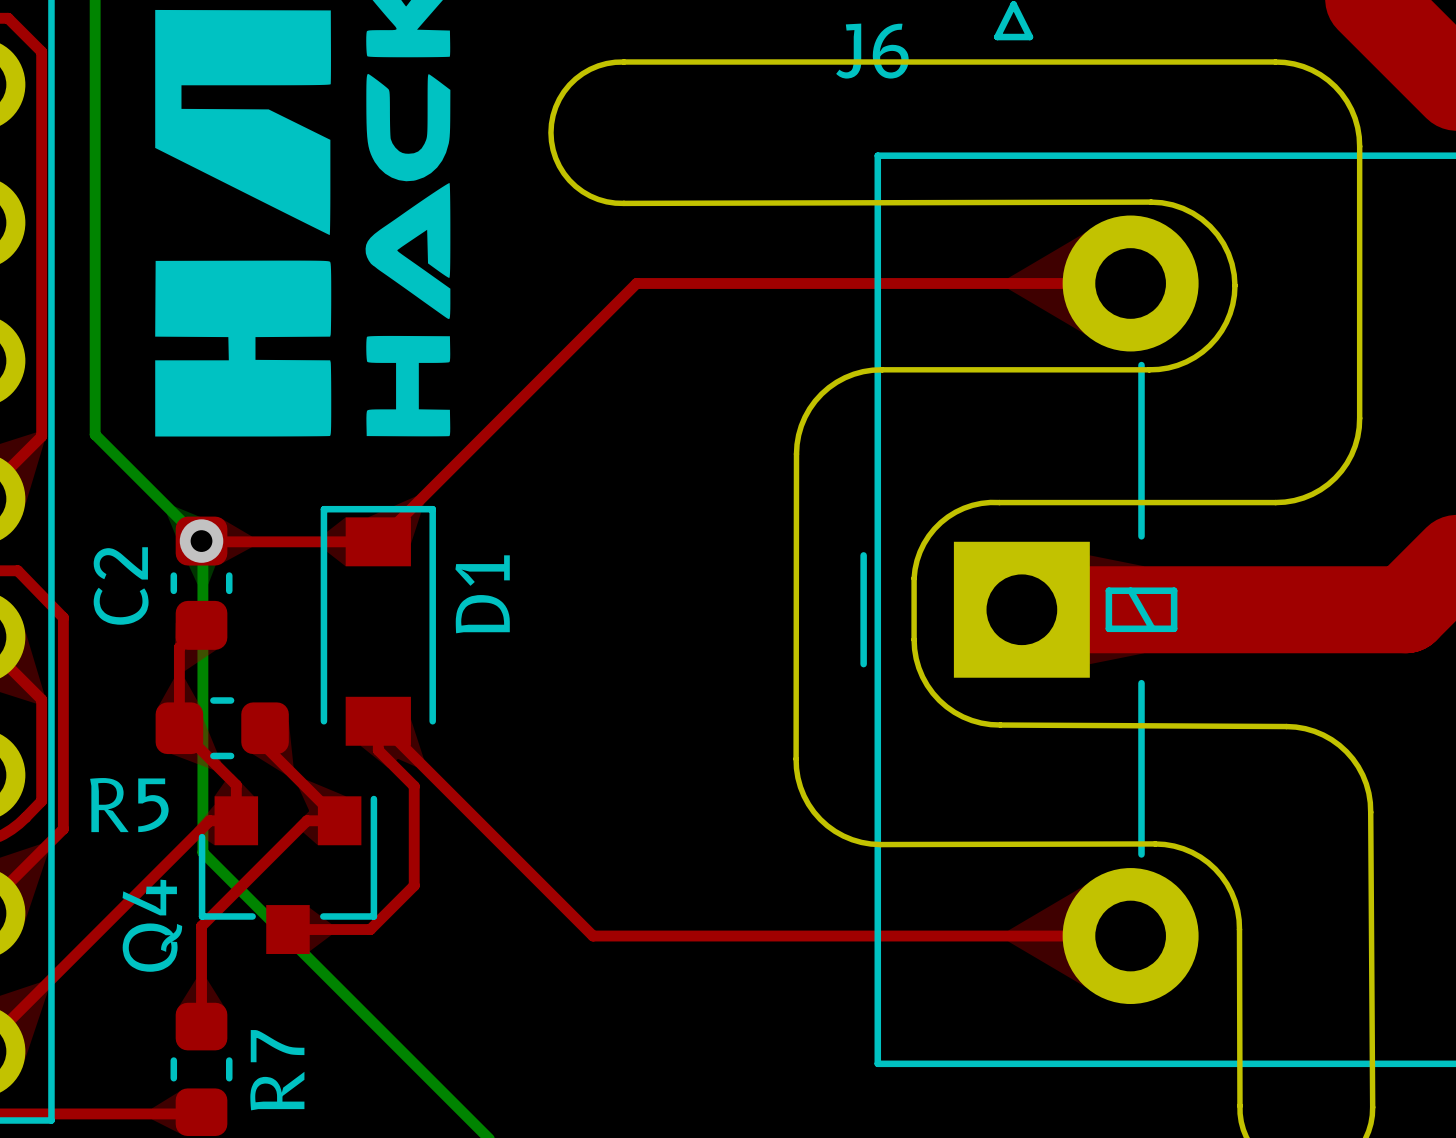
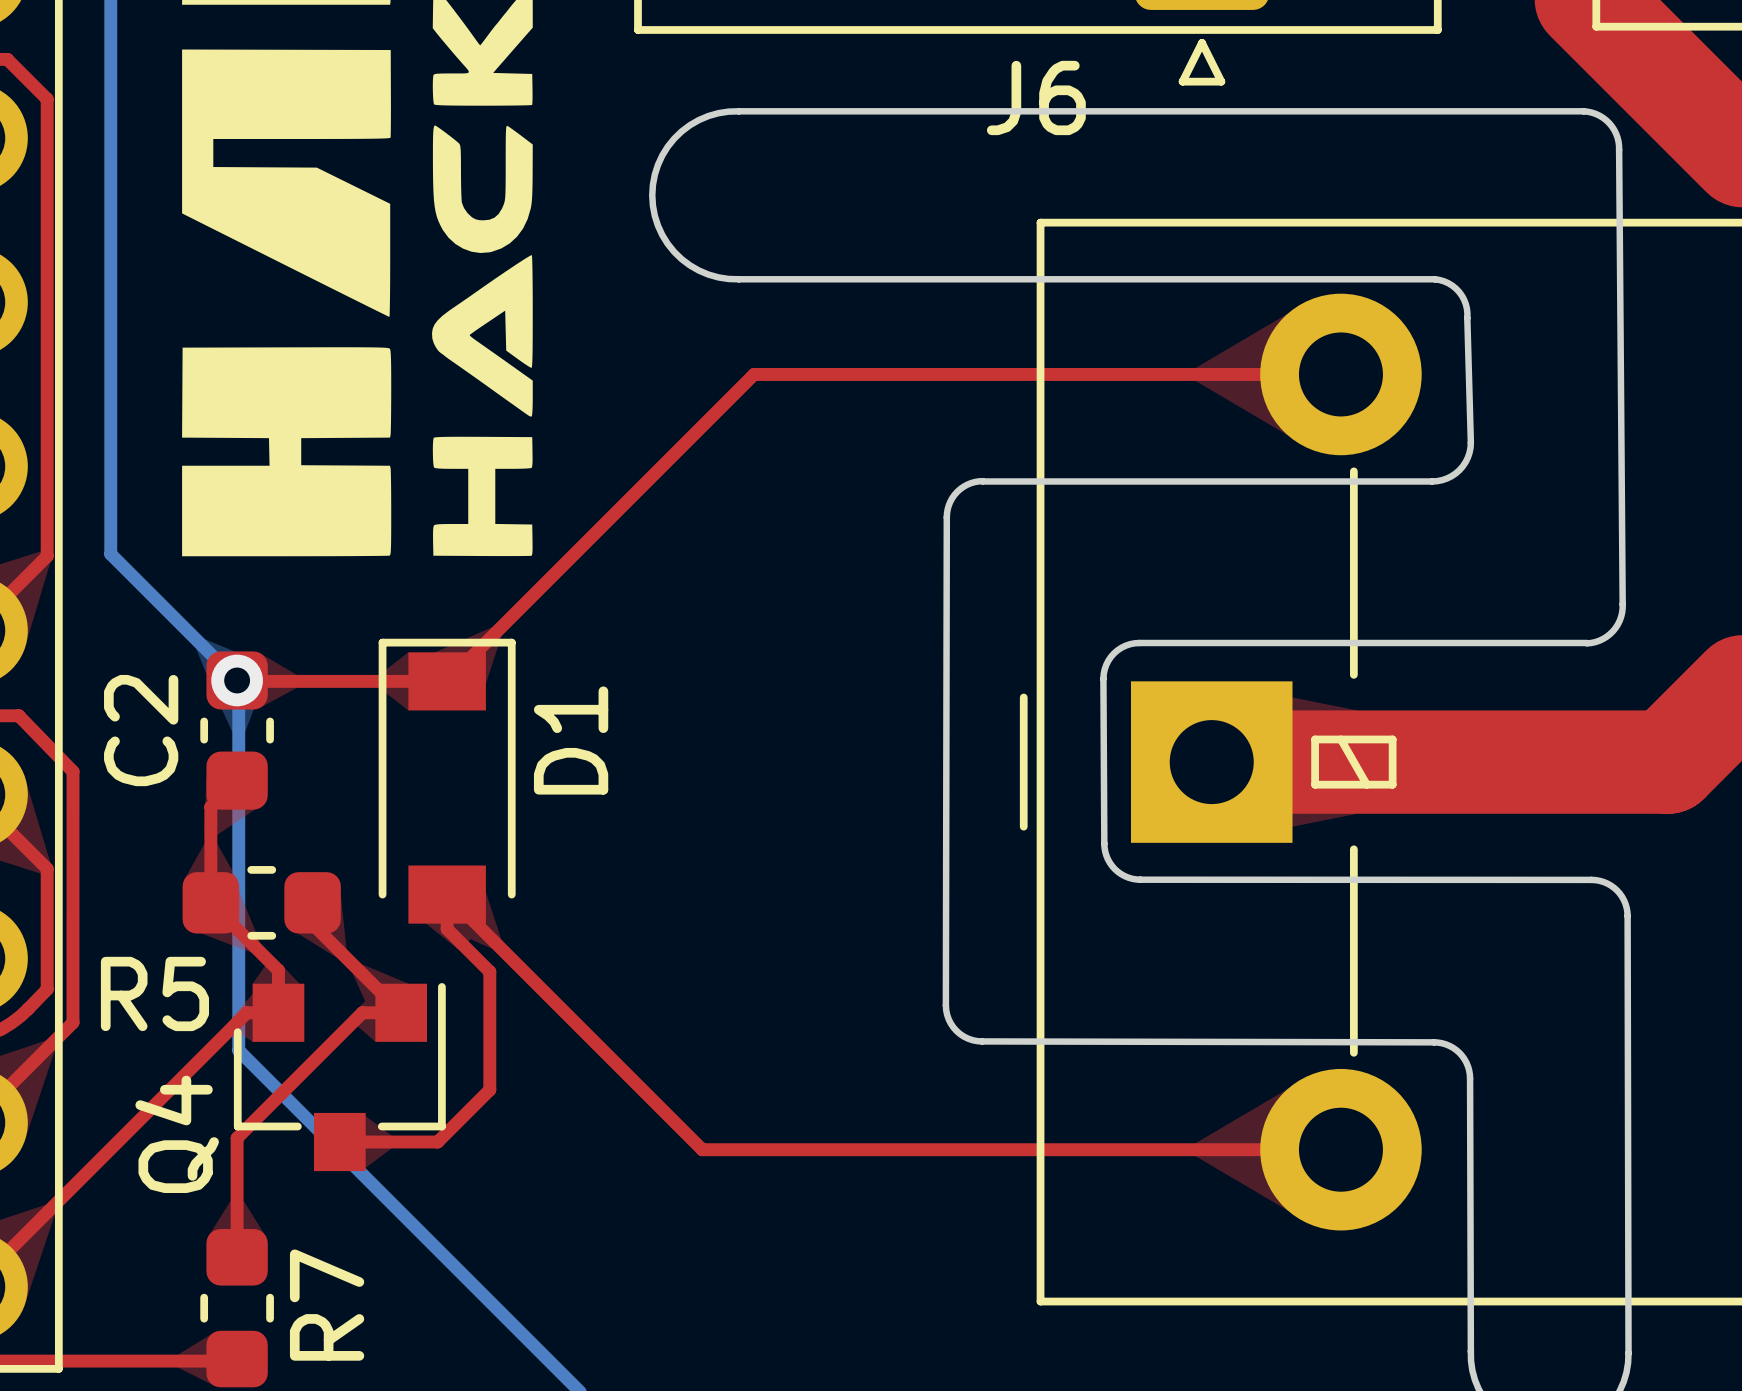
board edge: (1275, 62) (1303, 66) (1328, 80) (1346, 101) (1357, 127) (1359, 146) (1359, 418) (1355, 446) (1347, 463) (1335, 478) (1320, 489) (1303, 497) (1285, 502) (990, 502) (963, 508) (948, 516) (934, 528) (920, 551) (914, 578) (914, 649) (922, 676) (939, 700) (962, 716) (981, 723) (1000, 725) (1295, 727) (1323, 735) (1346, 751) (1362, 775) (1370, 802) (1372, 1107) -> (1512, 111) (1591, 112) (1609, 123) (1618, 141) (1622, 604) (1617, 624) (1606, 636) (1587, 643) (1139, 642) (1125, 645) (1110, 656) (1103, 674) (1104, 847) (1107, 859) (1114, 869) (1124, 876) (1136, 879) (1591, 879) (1607, 883) (1617, 890) (1625, 904) (1627, 915) (1628, 1353)
board edge: (623, 203) (1151, 202) (1183, 208) (1202, 219) (1217, 234) (1232, 263) (1234, 285) (1232, 304) (1226, 322) (1216, 338) (1202, 351) (1186, 361) (1168, 367) (1149, 369) (872, 370) (853, 374) (836, 382) (815, 401) (801, 425) (796, 454) (796, 758) (800, 787) (813, 812) (835, 831) (861, 842) (880, 844) (1164, 844) (1183, 848) (1208, 862) (1221, 876) (1231, 892) (1239, 920) (1239, 1105) -> (982, 481) (970, 483) (960, 489) (950, 501) (947, 513) (945, 1005) (950, 1023) (963, 1036) (981, 1041) (1433, 1042) (1453, 1047) (1464, 1059) (1469, 1074) (1470, 1351)
board edge: none -> (738, 279) (1435, 279) (1452, 285) (1459, 291) (1465, 304) (1470, 447) (1462, 466) (1446, 478) (1432, 481) (982, 481)

